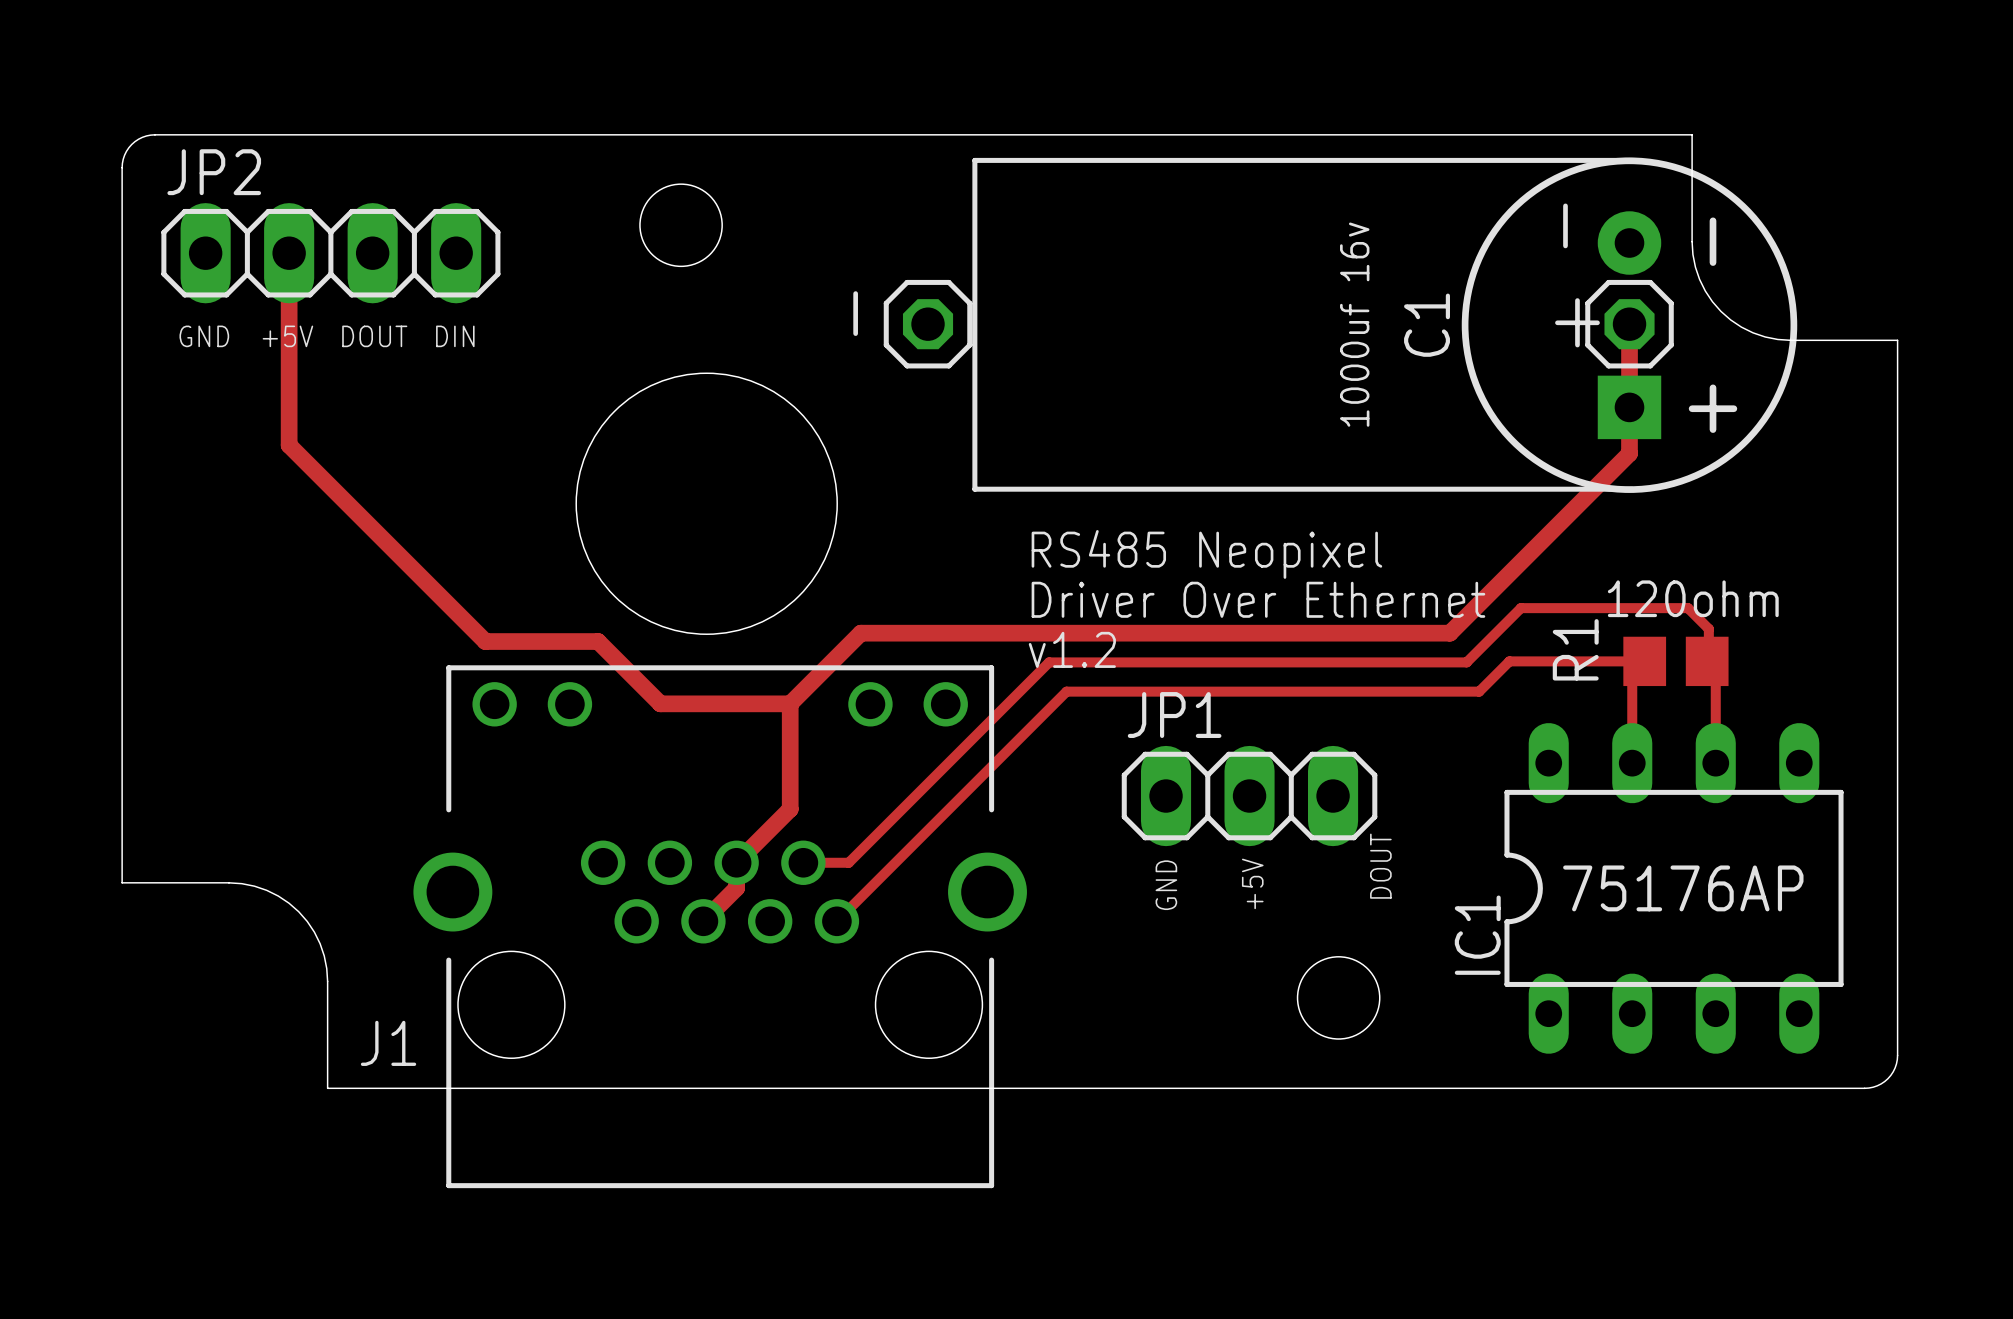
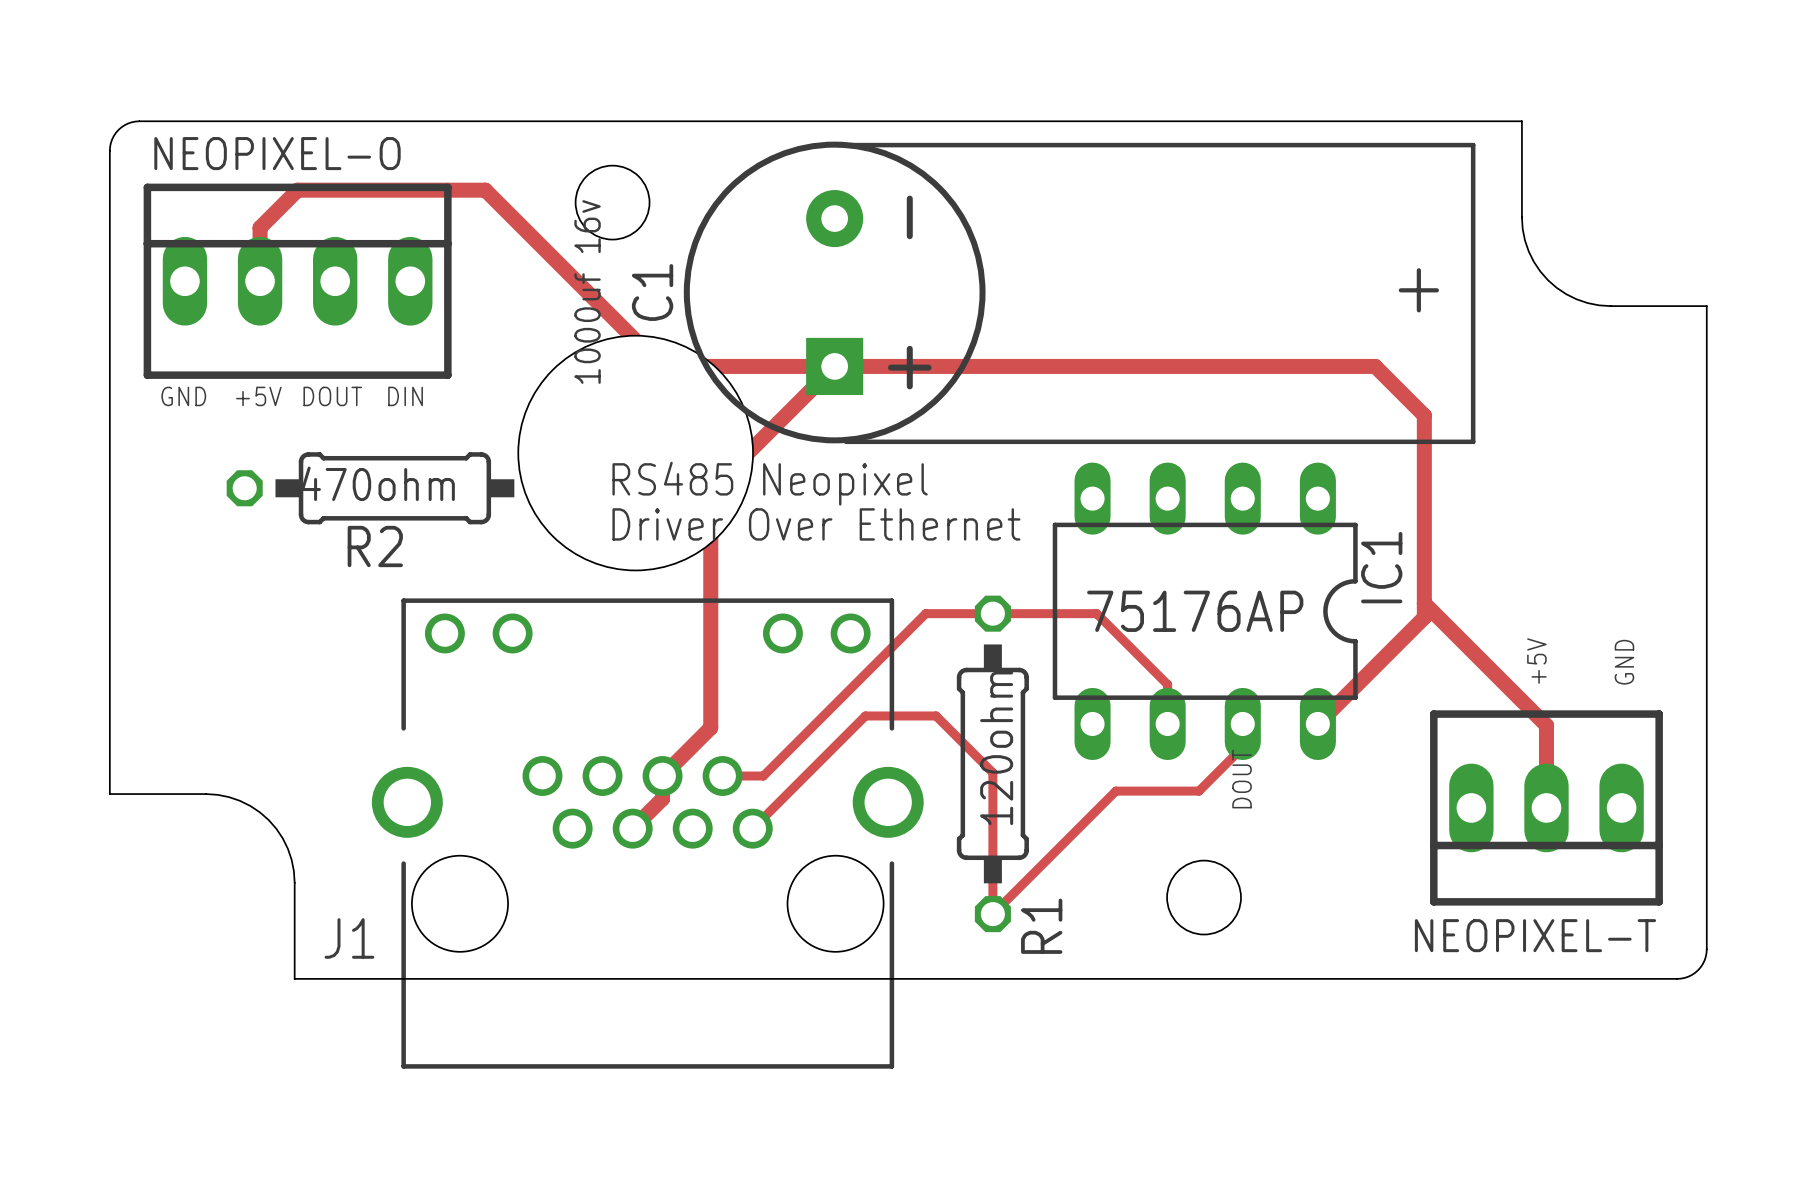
line: (1632, 160) (974, 160) (974, 489) (1632, 489) -> none
line: none -> (838, 145) (1473, 145) (1473, 441) (845, 441)
text: - (1565, 225) -> none
track: none -> (260, 227) (297, 190) (485, 190) (661, 366) (1375, 366) (1424, 415) (1424, 617) (1317, 723)
JP2: (330, 253) -> none
track: (289, 312) (289, 445) (485, 641) (598, 641) (660, 703) (790, 703) (860, 633) (1449, 633) (1629, 453) (1629, 324) -> none
NEOPIXEL-O: none -> (297, 281)
text: - (855, 313) -> none
part: (928, 324) -> none
part: (1629, 324) -> none
C1 position: (1629, 325) -> (834, 292)
text position: GND (204, 336) -> GND (183, 396)
text position: +5V (287, 336) -> +5V (258, 396)
text position: DOUT (374, 336) -> DOUT (332, 396)
text position: DIN (455, 336) -> DIN (405, 396)
track: none -> (834, 366) (710, 490) (710, 633)
R2: none -> 470ohm (394, 488)
text position: RS485 Neopixel (1206, 554) -> RS485 Neopixel (770, 483)
text position: Driver Over Ethernet (1258, 599) -> Driver Over Ethernet (816, 524)
R1 footprint: [1623, 636, 1729, 687] -> [956, 595, 1029, 933]
text: v1.2 (1072, 649) -> none
R1 name position: R1 (1575, 649) -> R1 (1041, 926)
track: none -> (1424, 603) (1546, 725) (1546, 807)
track: (1029, 682) (1049, 662) (1466, 662) (1520, 608) (1687, 608) (1708, 629) (1708, 659) (1707, 661) (1715, 669) (1715, 763) -> (925, 613) (1096, 613) (1167, 684) (1167, 723)
text: none -> GND (1624, 662)
track: (1632, 763) (1632, 673) (1644, 661) (1509, 661) (1479, 691) (1066, 691) (962, 796) -> (1242, 723) (1242, 747) (1199, 791) (1115, 791) (992, 914) (992, 772) (936, 715) (865, 715)
JP1: (1249, 796) -> none
text position: +5V (1252, 883) -> +5V (1536, 661)
text: GND (1166, 885) -> none
IC1 rotation: 0° (1674, 888) -> 180° (1205, 611)
IC1 position: (1674, 888) -> (1205, 611)
NEOPIXEL-T: none -> (1546, 807)

